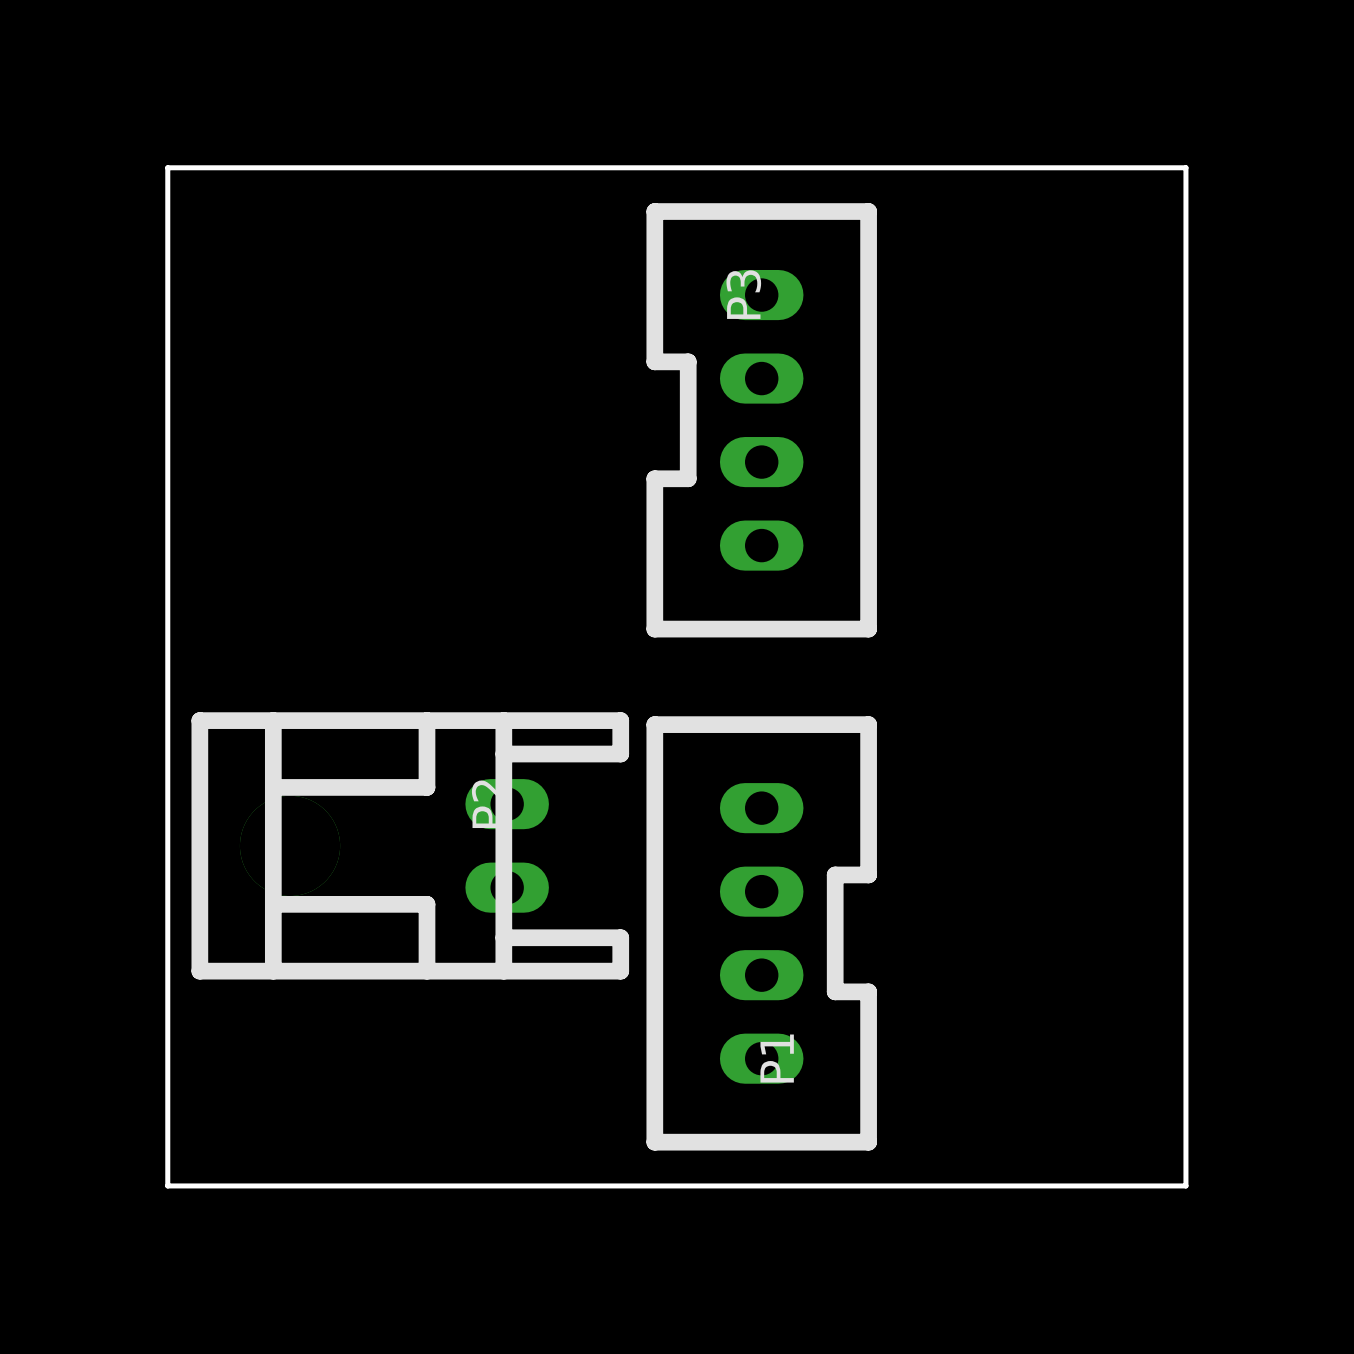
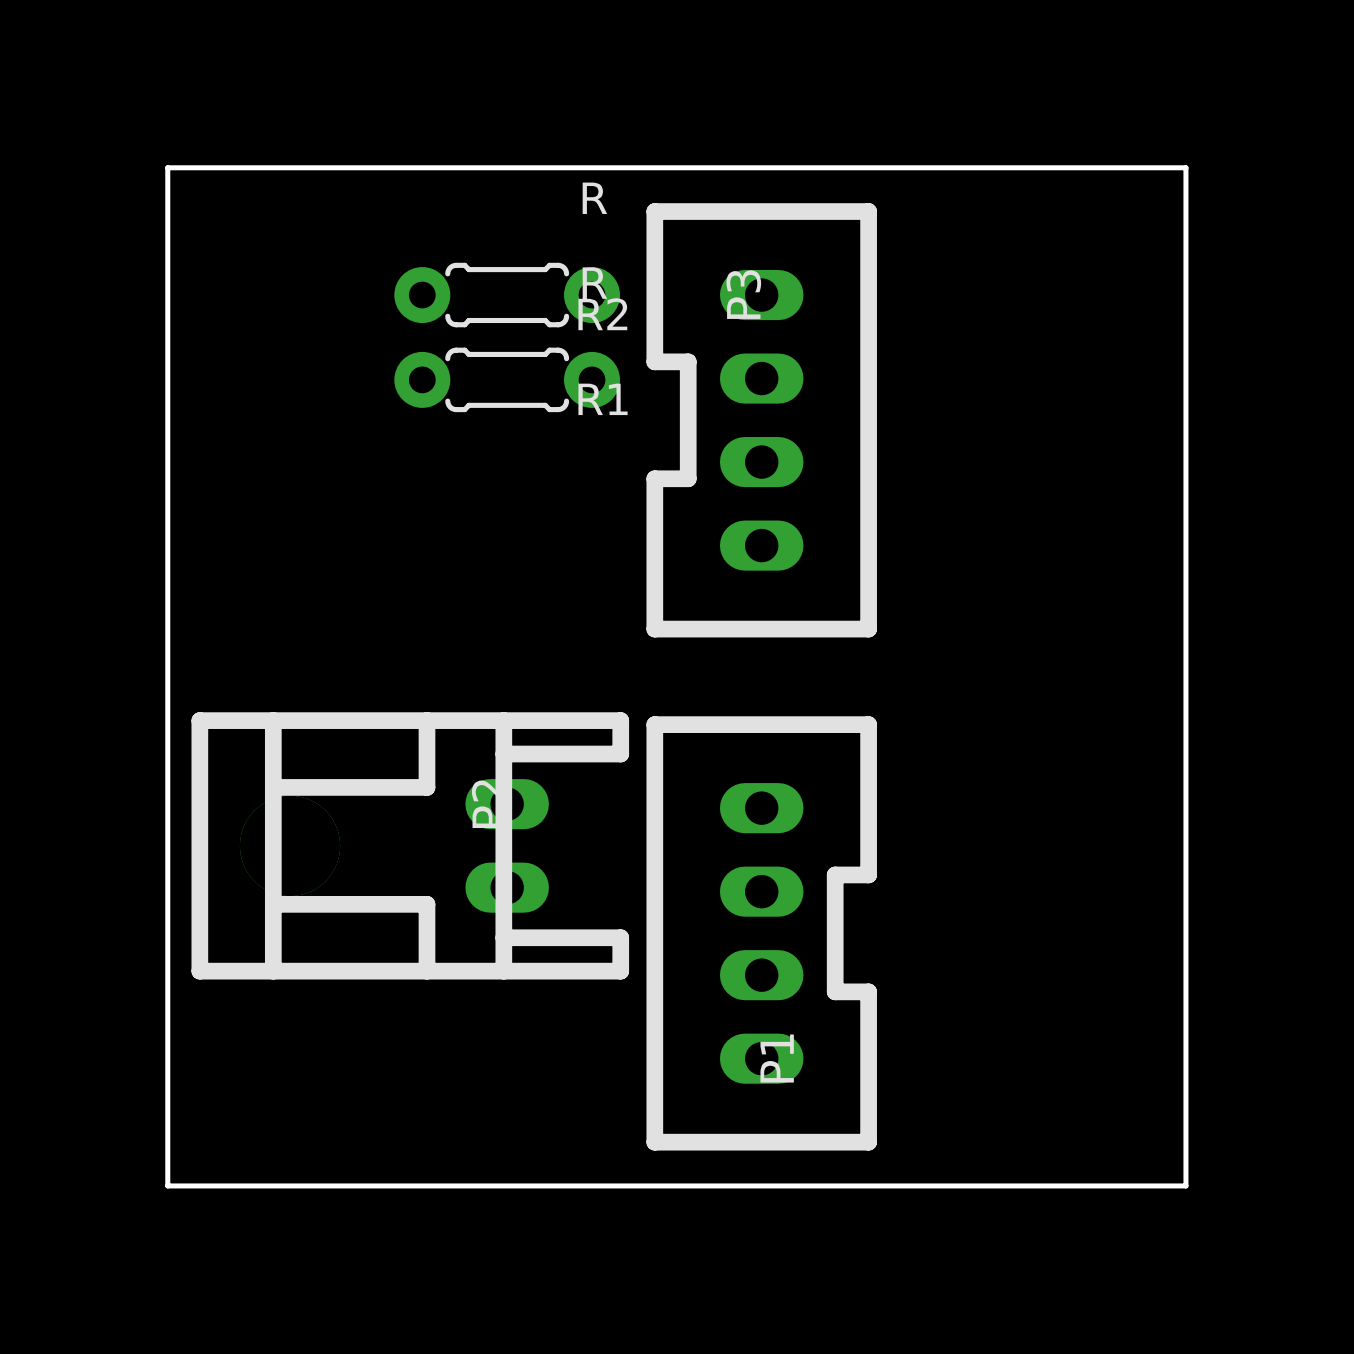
R2: none -> R (507, 295)
R1: none -> R (507, 379)

